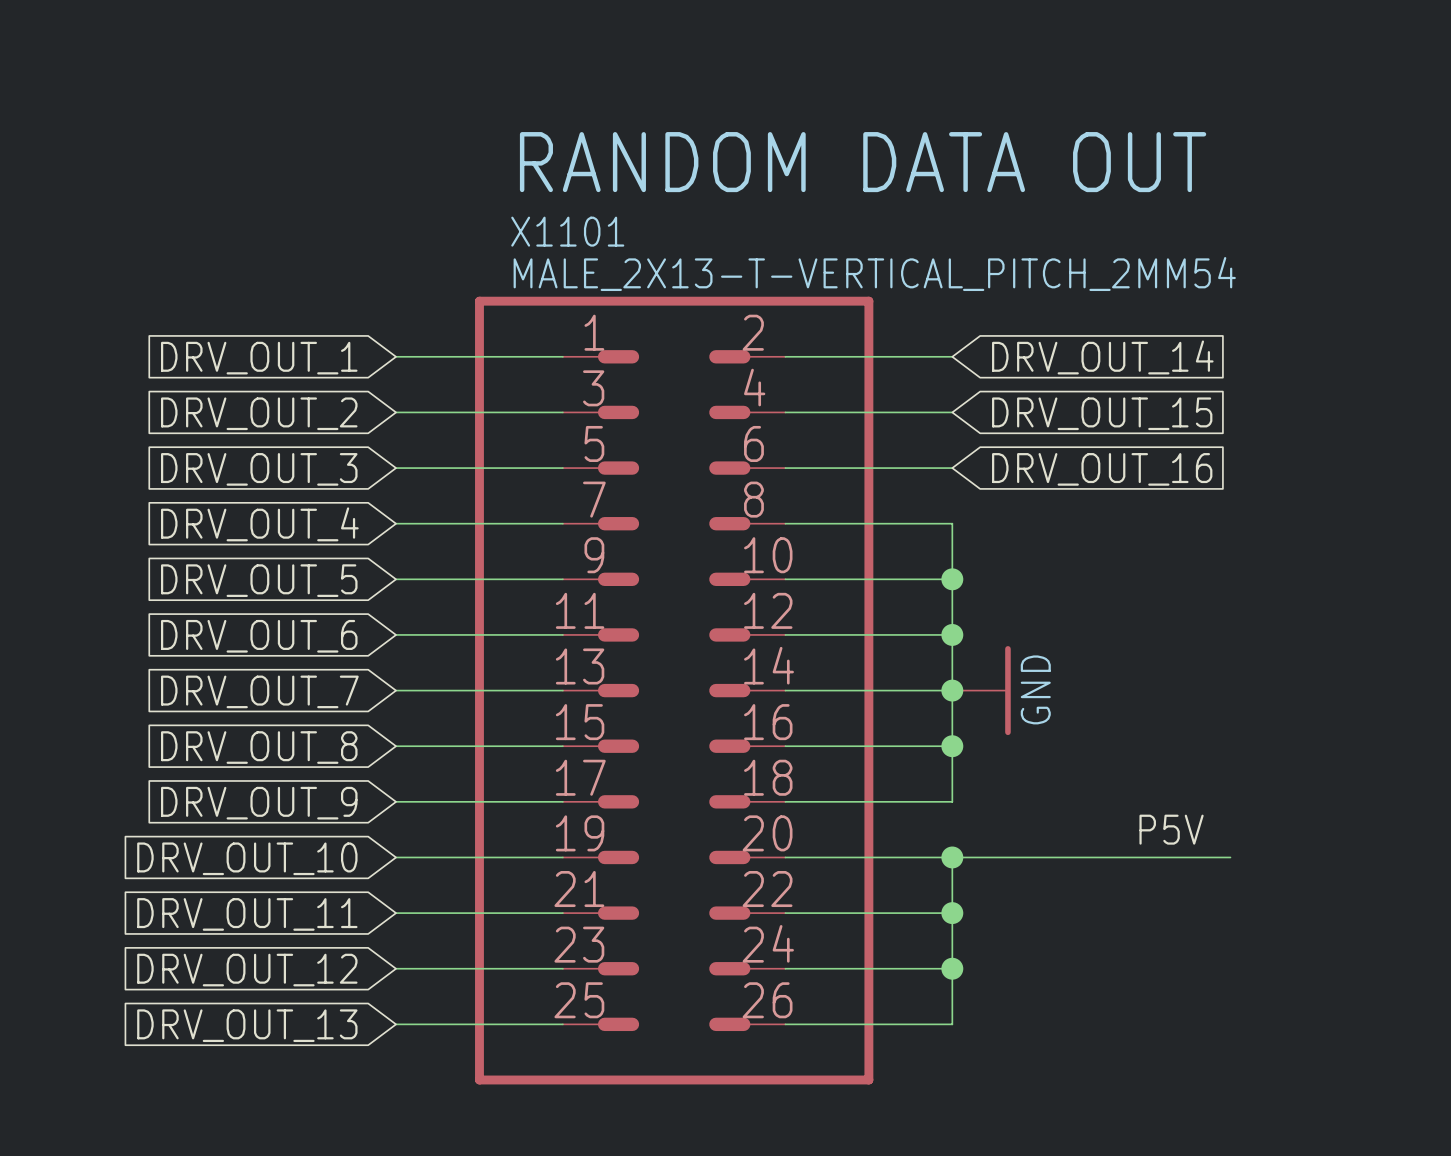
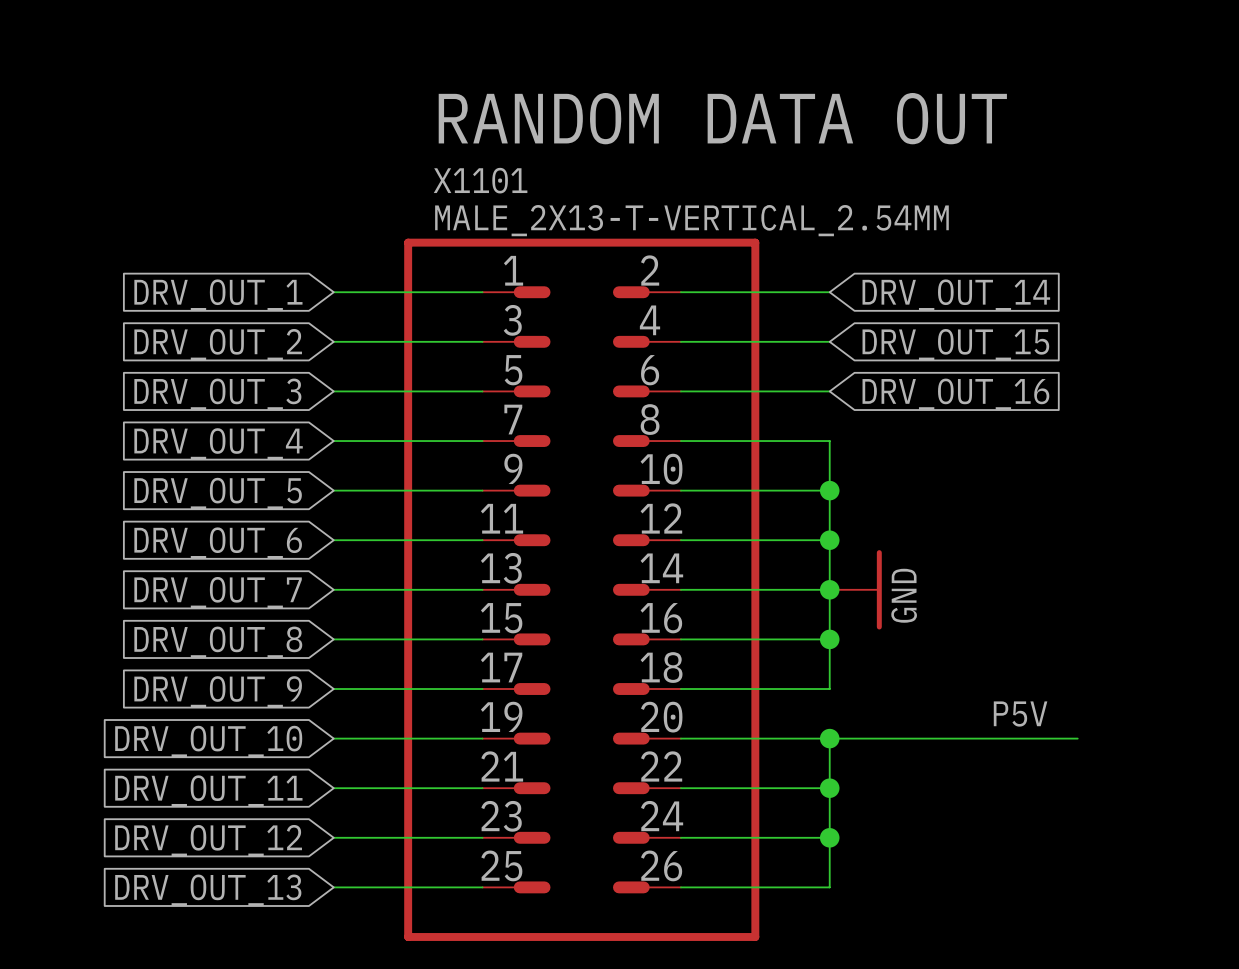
X1101 value: MALE_2X13-T-VERTICAL_PITCH_2MM54 (874, 274) -> MALE_2X13-T-VERTICAL_2.54MM (691, 220)

